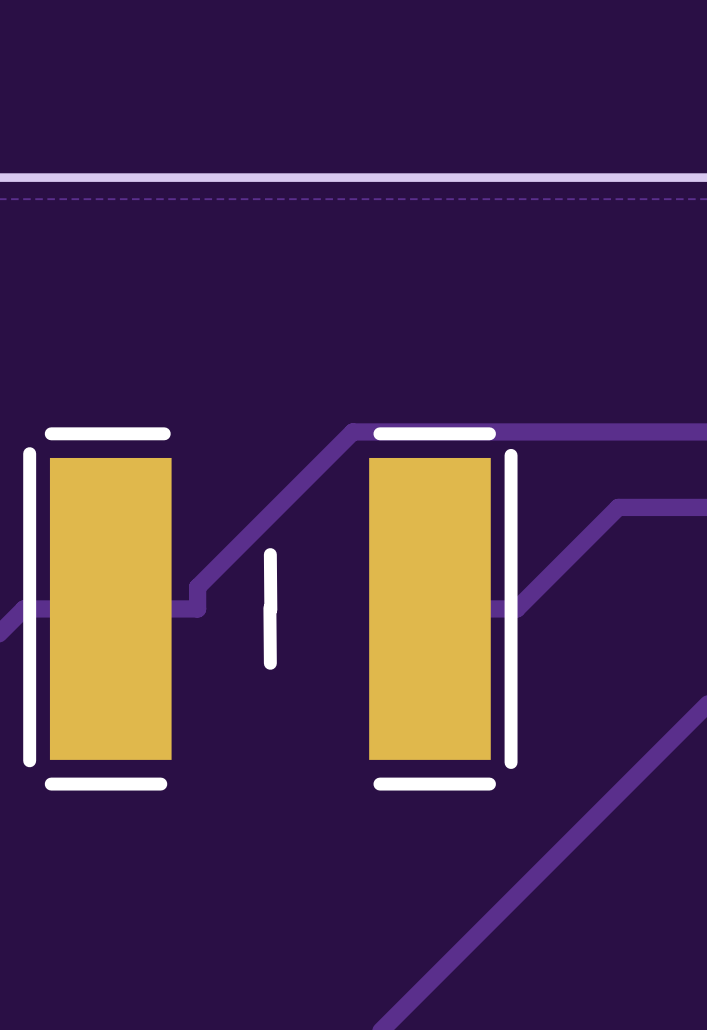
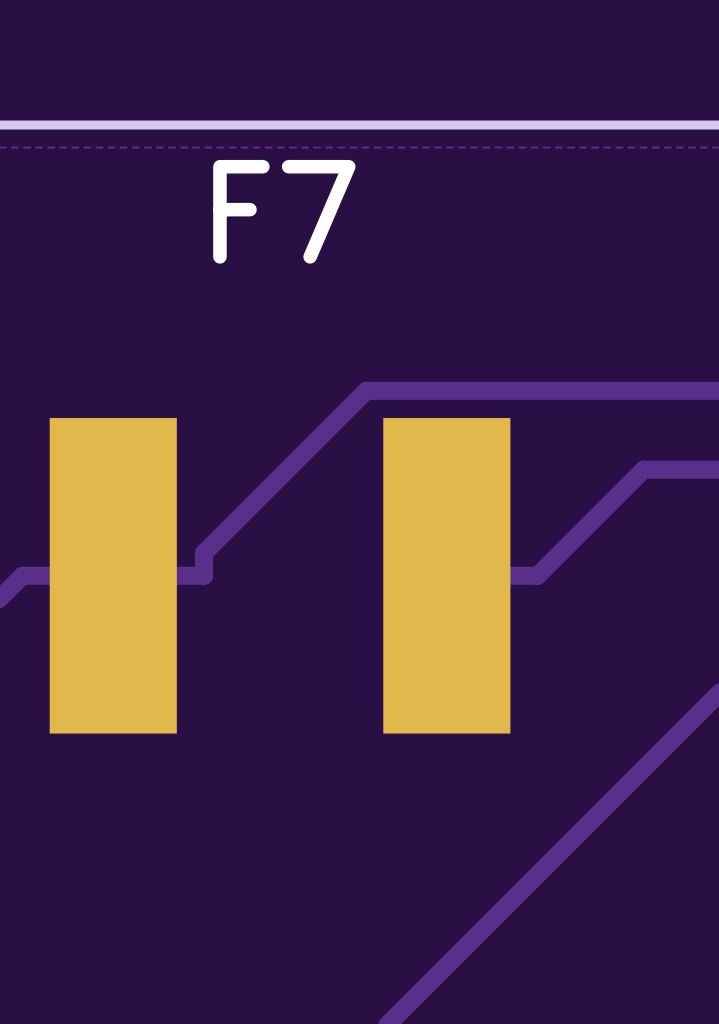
part: (270, 608) -> none
F7: none -> (280, 575)

